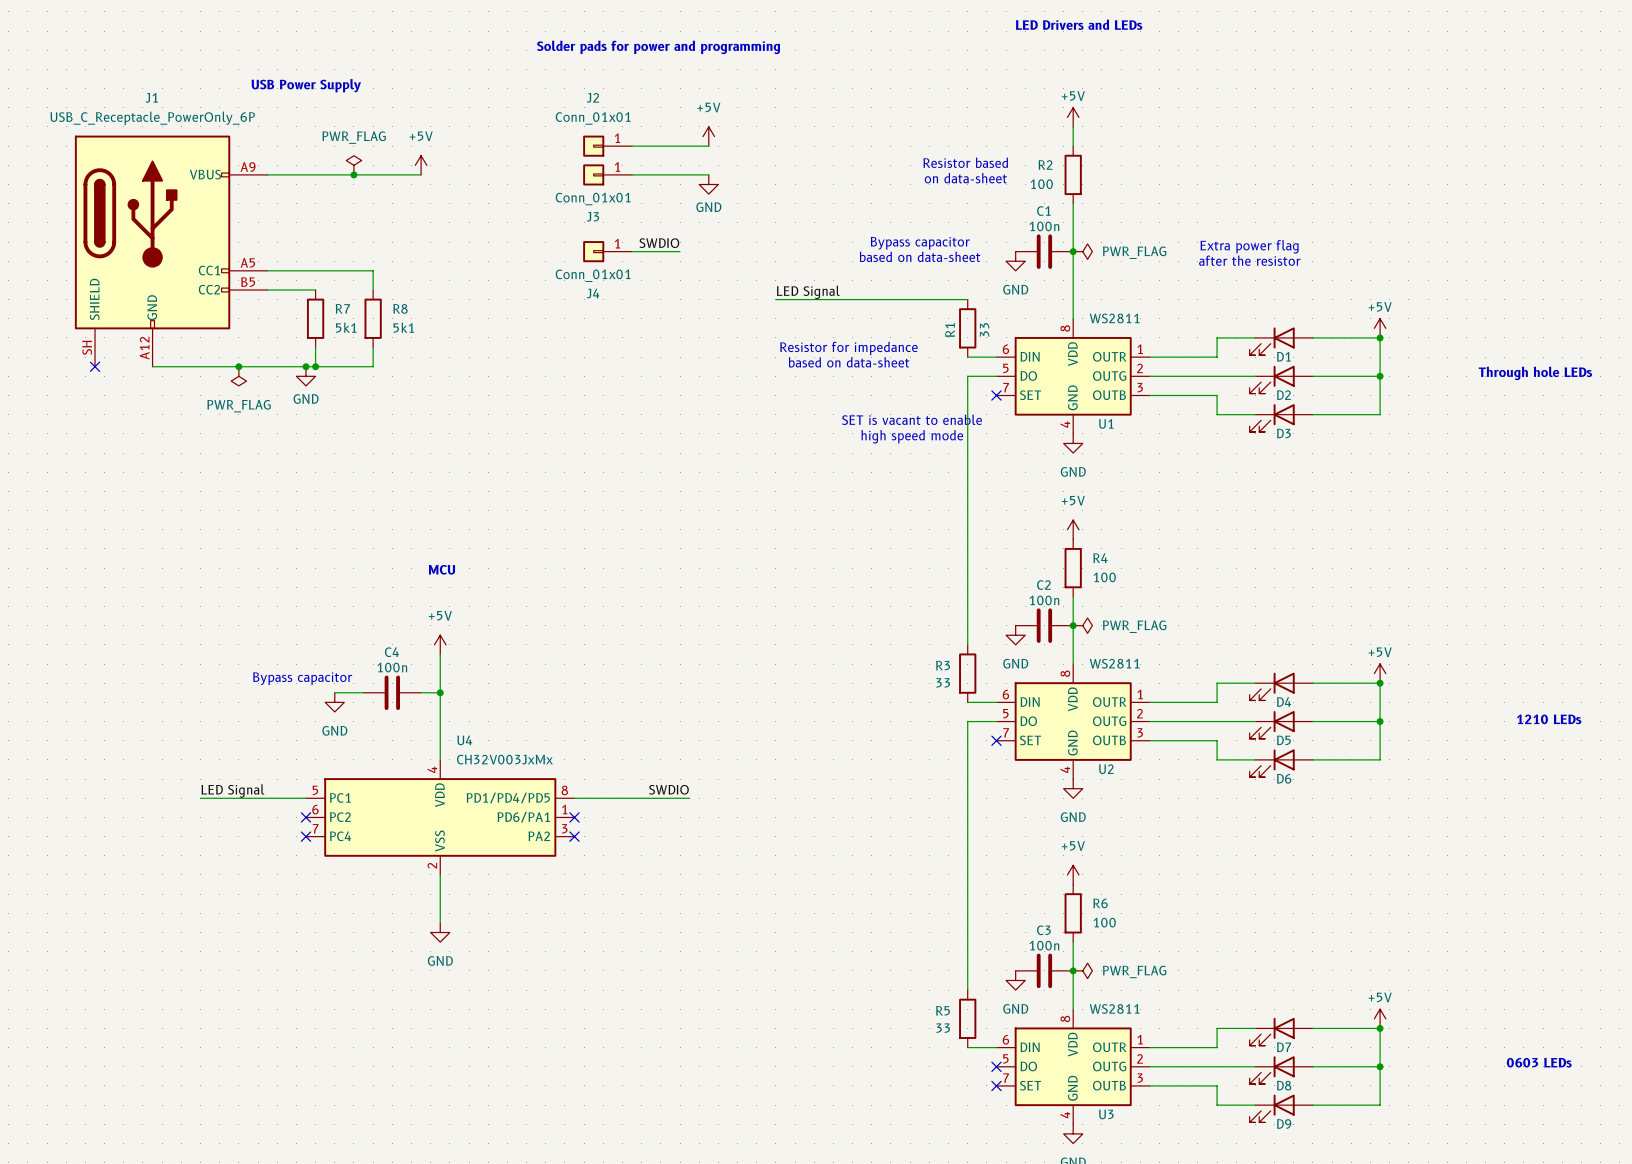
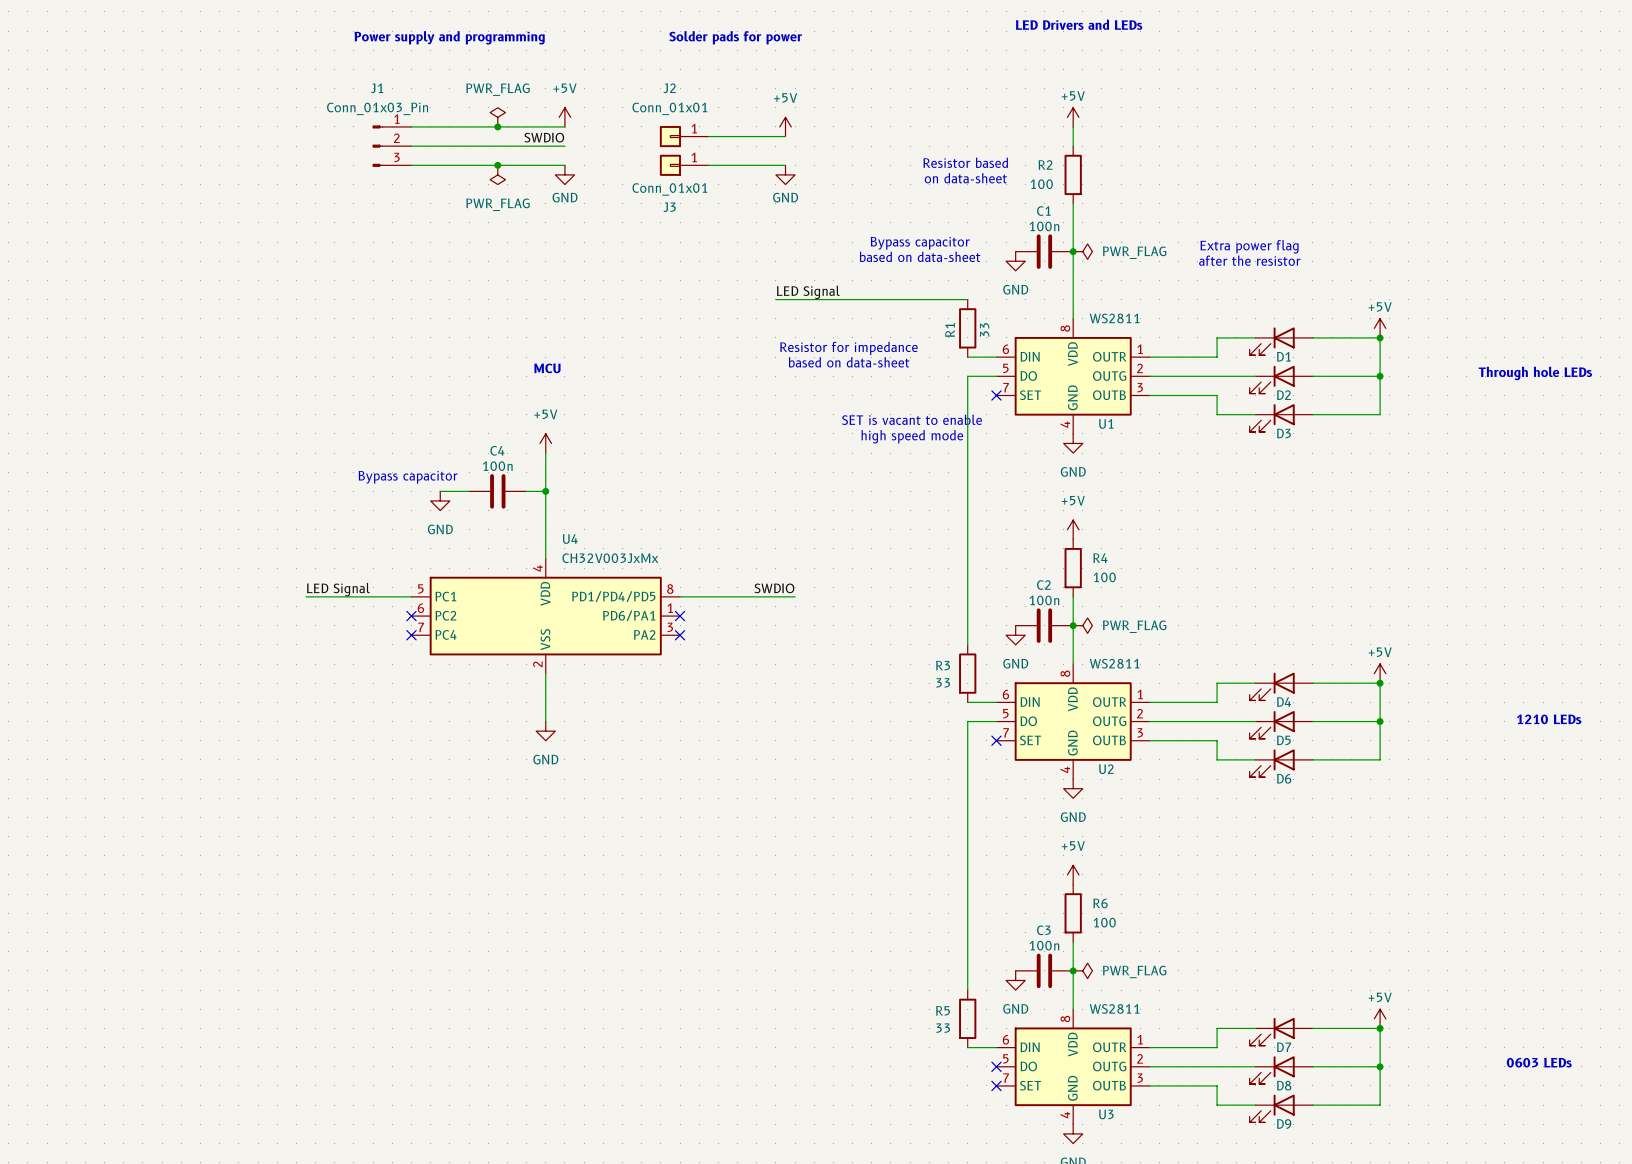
text: none -> Power supply and programming (449, 37)
text: Solder pads for power and programming (658, 47) -> Solder pads for power (735, 37)
text: USB Power Supply (306, 85) -> none
J1 name position: J1 (151, 97) -> J1 (377, 88)
power symbol: none -> PWR_FLAG (497, 117)
power symbol: none -> +5V (564, 117)
J1 value: USB_C_Receptacle_PowerOnly_6P (152, 118) -> Conn_01x03_Pin (377, 108)
wire: none -> (411, 126) (564, 126)
junction: none -> (497, 126)
power symbol: none -> +5V (785, 126)
J1 symbol: [74, 135, 268, 367] -> [372, 125, 412, 167]
power symbol: +5V (708, 136) -> none
wire: none -> (411, 146) (564, 146)
J2 position: (607, 146) -> (684, 136)
wire: (632, 146) (708, 146) -> (708, 136) (785, 136)
power symbol: PWR_FLAG (353, 165) -> none
power symbol: +5V (421, 165) -> none
junction: none -> (497, 165)
wire: (267, 174) (421, 174) -> (411, 165) (564, 165)
junction: (353, 174) -> none
power symbol: none -> PWR_FLAG (497, 174)
power symbol: none -> GND (564, 174)
J3 position: (607, 174) -> (684, 165)
wire: (632, 174) (708, 174) -> (708, 165) (785, 165)
power symbol: none -> GND (785, 174)
power symbol: GND (708, 184) -> none
label position: SWDIO (659, 243) -> SWDIO (544, 137)
J4: Conn_01x01 (607, 251) -> none
wire: (632, 251) (680, 251) -> none
wire: (267, 270) (373, 270) (373, 290) -> none
wire: (267, 290) (315, 290) -> none
R7: 5k1 (315, 318) -> none
R8: 5k1 (373, 318) -> none
wire: (315, 347) (315, 366) -> none
wire: (373, 347) (373, 366) (152, 366) -> none
no-connect mark: (95, 366) -> none
junction: (238, 366) -> none
junction: (306, 366) -> none
junction: (315, 366) -> none
text: none -> MCU (547, 368)
power symbol: PWR_FLAG (238, 376) -> none
power symbol: GND (306, 376) -> none
power symbol: none -> +5V (545, 443)
wire: none -> (545, 453) (545, 558)
text: none -> Bypass capacitor (408, 477)
wire: none -> (440, 491) (469, 491)
wire: none -> (526, 491) (545, 491)
junction: none -> (545, 491)
power symbol: none -> GND (440, 500)
text: MCU (441, 569) -> none
label: none -> SWDIO (774, 588)
label: none -> LED Signal (338, 589)
wire: none -> (306, 596) (411, 596)
wire: none -> (680, 596) (795, 596)
no-connect mark: none -> (411, 616)
no-connect mark: none -> (680, 616)
no-connect mark: none -> (411, 635)
no-connect mark: none -> (680, 635)
power symbol: +5V (440, 644) -> none
wire: (440, 654) (440, 759) -> none
wire: none -> (545, 673) (545, 721)
text: Bypass capacitor (302, 678) -> none
wire: (334, 692) (363, 692) -> none
C4 position: (392, 692) -> (497, 491)
wire: (421, 692) (440, 692) -> none
junction: (440, 692) -> none
power symbol: GND (334, 702) -> none
power symbol: none -> GND (545, 731)
label: SWDIO (668, 789) -> none
label: LED Signal (232, 791) -> none
wire: (200, 798) (306, 798) -> none
wire: (574, 798) (689, 798) -> none
no-connect mark: (306, 817) -> none
U4 position: (440, 817) -> (545, 616)
no-connect mark: (574, 817) -> none
no-connect mark: (306, 836) -> none
no-connect mark: (574, 836) -> none
wire: (440, 874) (440, 922) -> none
power symbol: GND (440, 932) -> none

